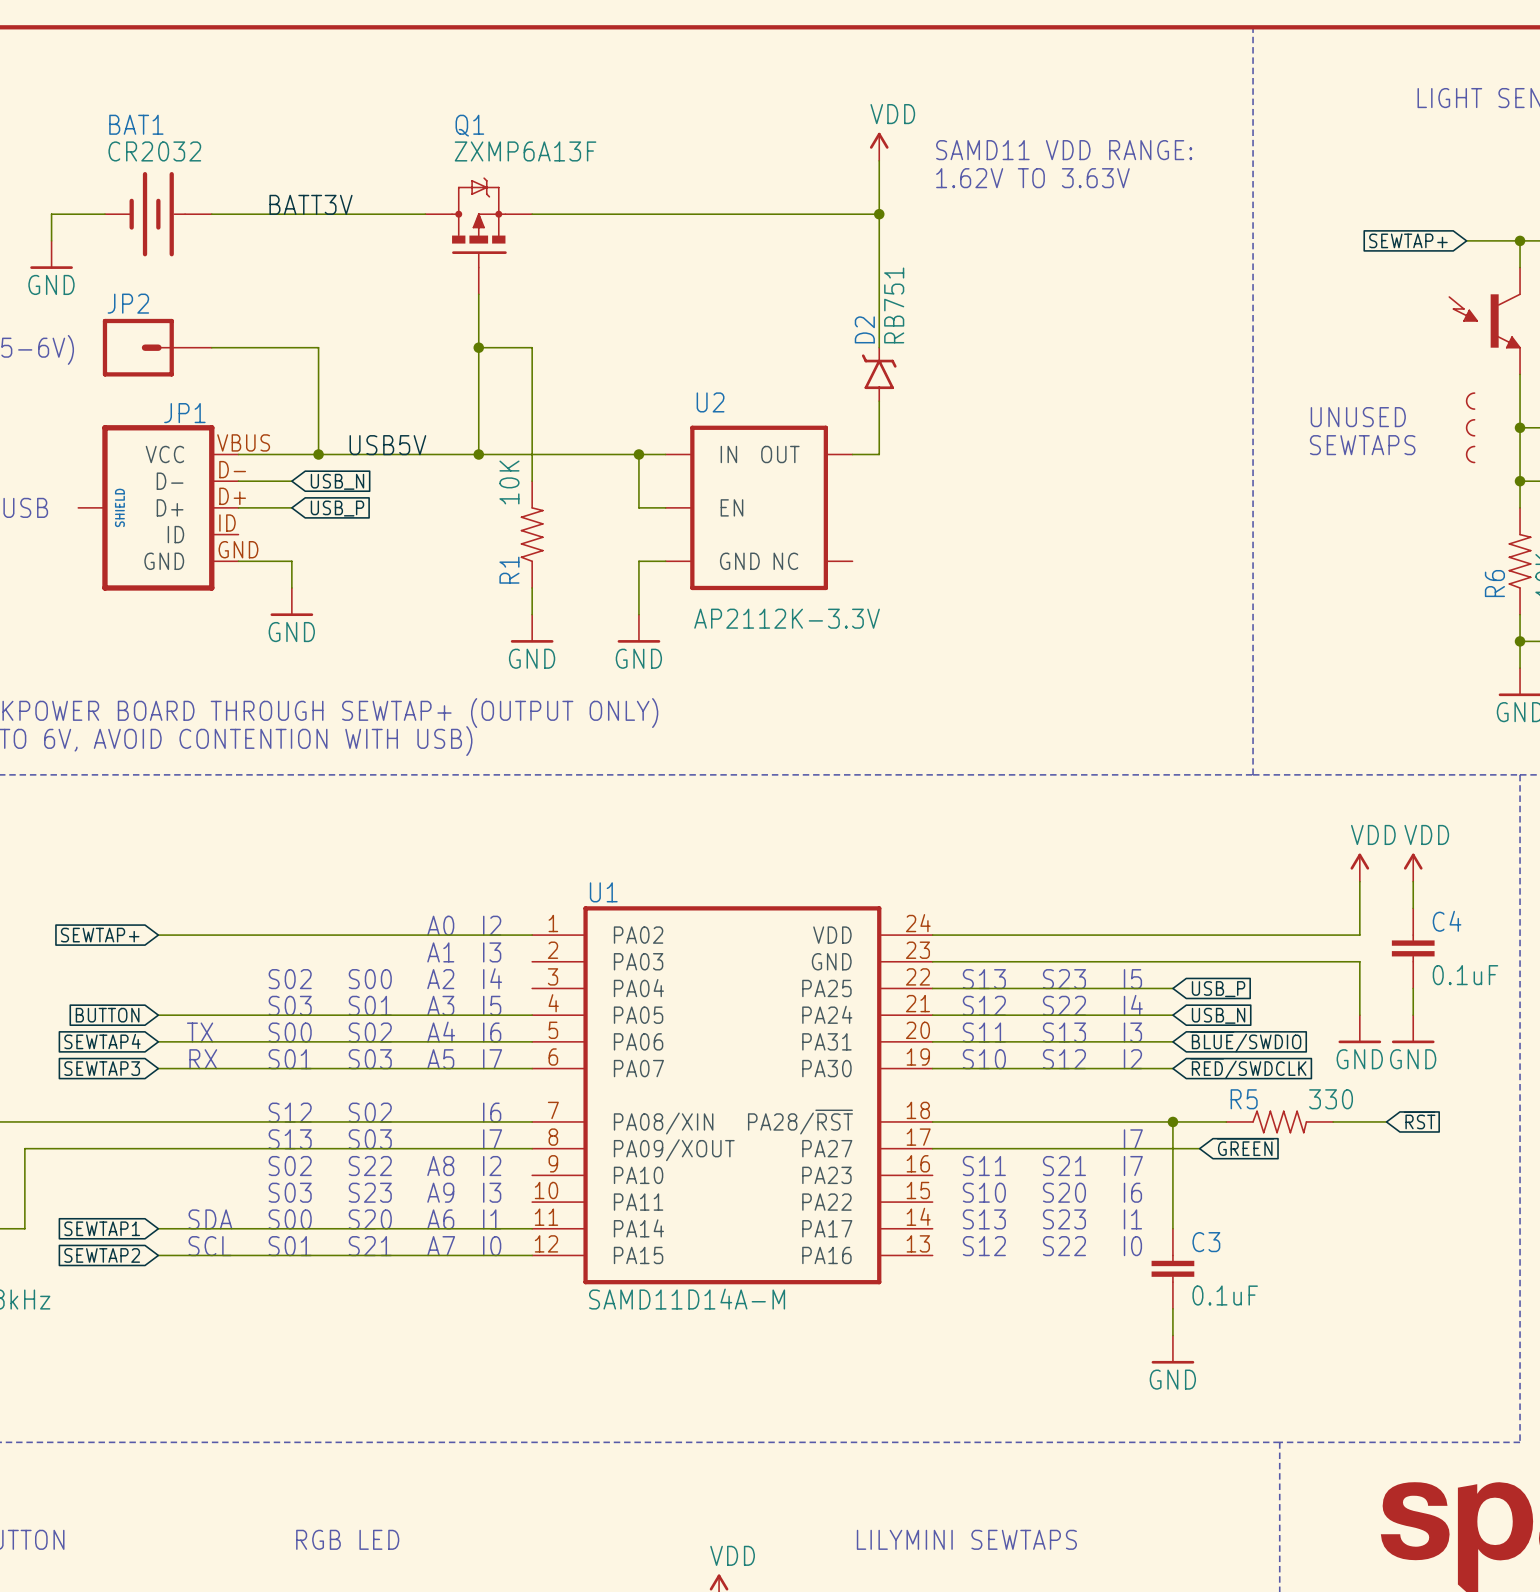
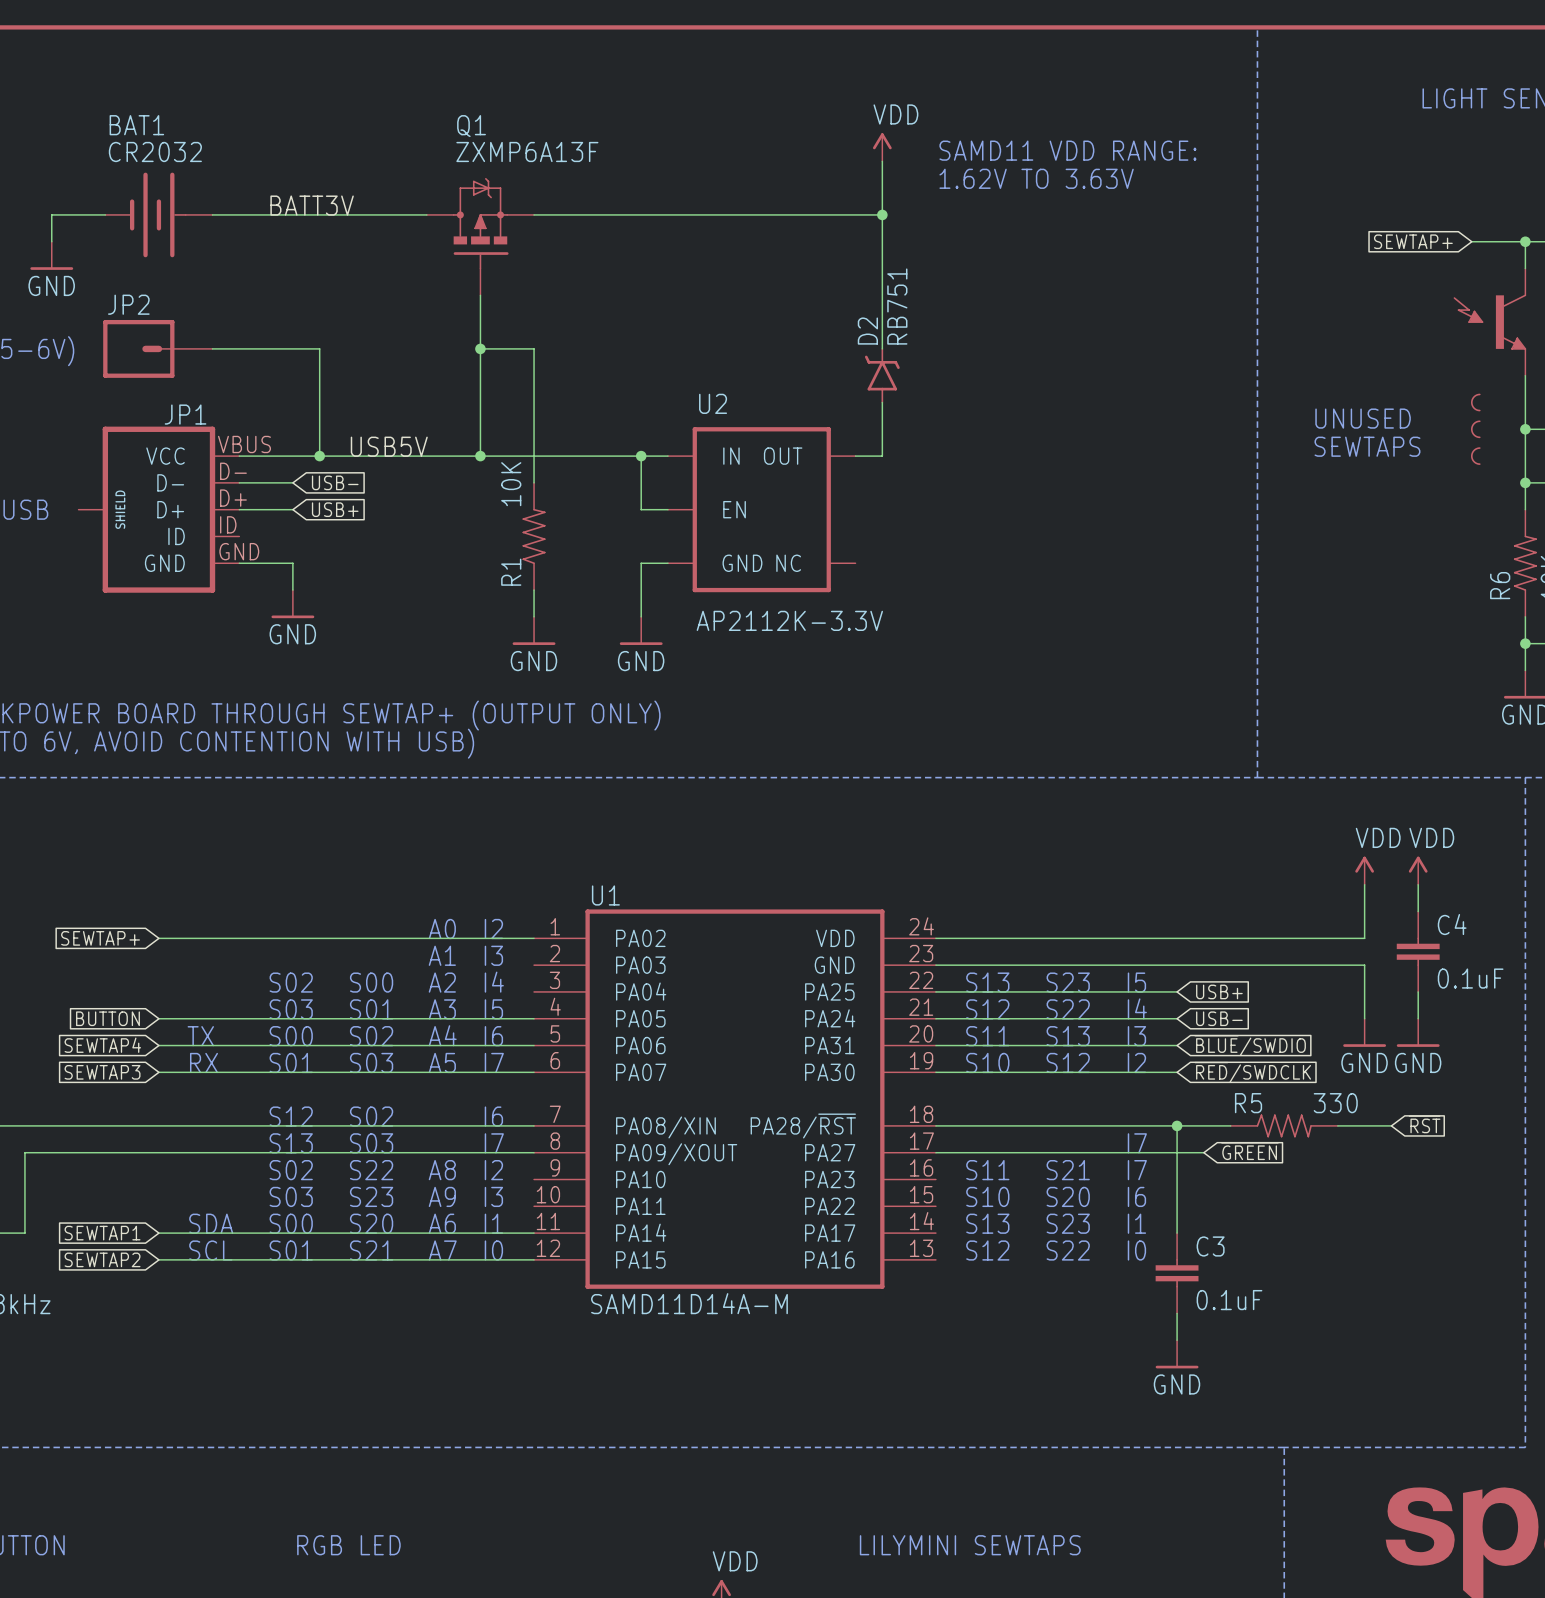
global label: USB_N (337, 481) -> USB- (335, 482)
global label: USB_P (337, 508) -> USB+ (335, 509)
global label: USB_P (1218, 989) -> USB+ (1219, 991)
global label: USB_N (1218, 1015) -> USB- (1219, 1018)

